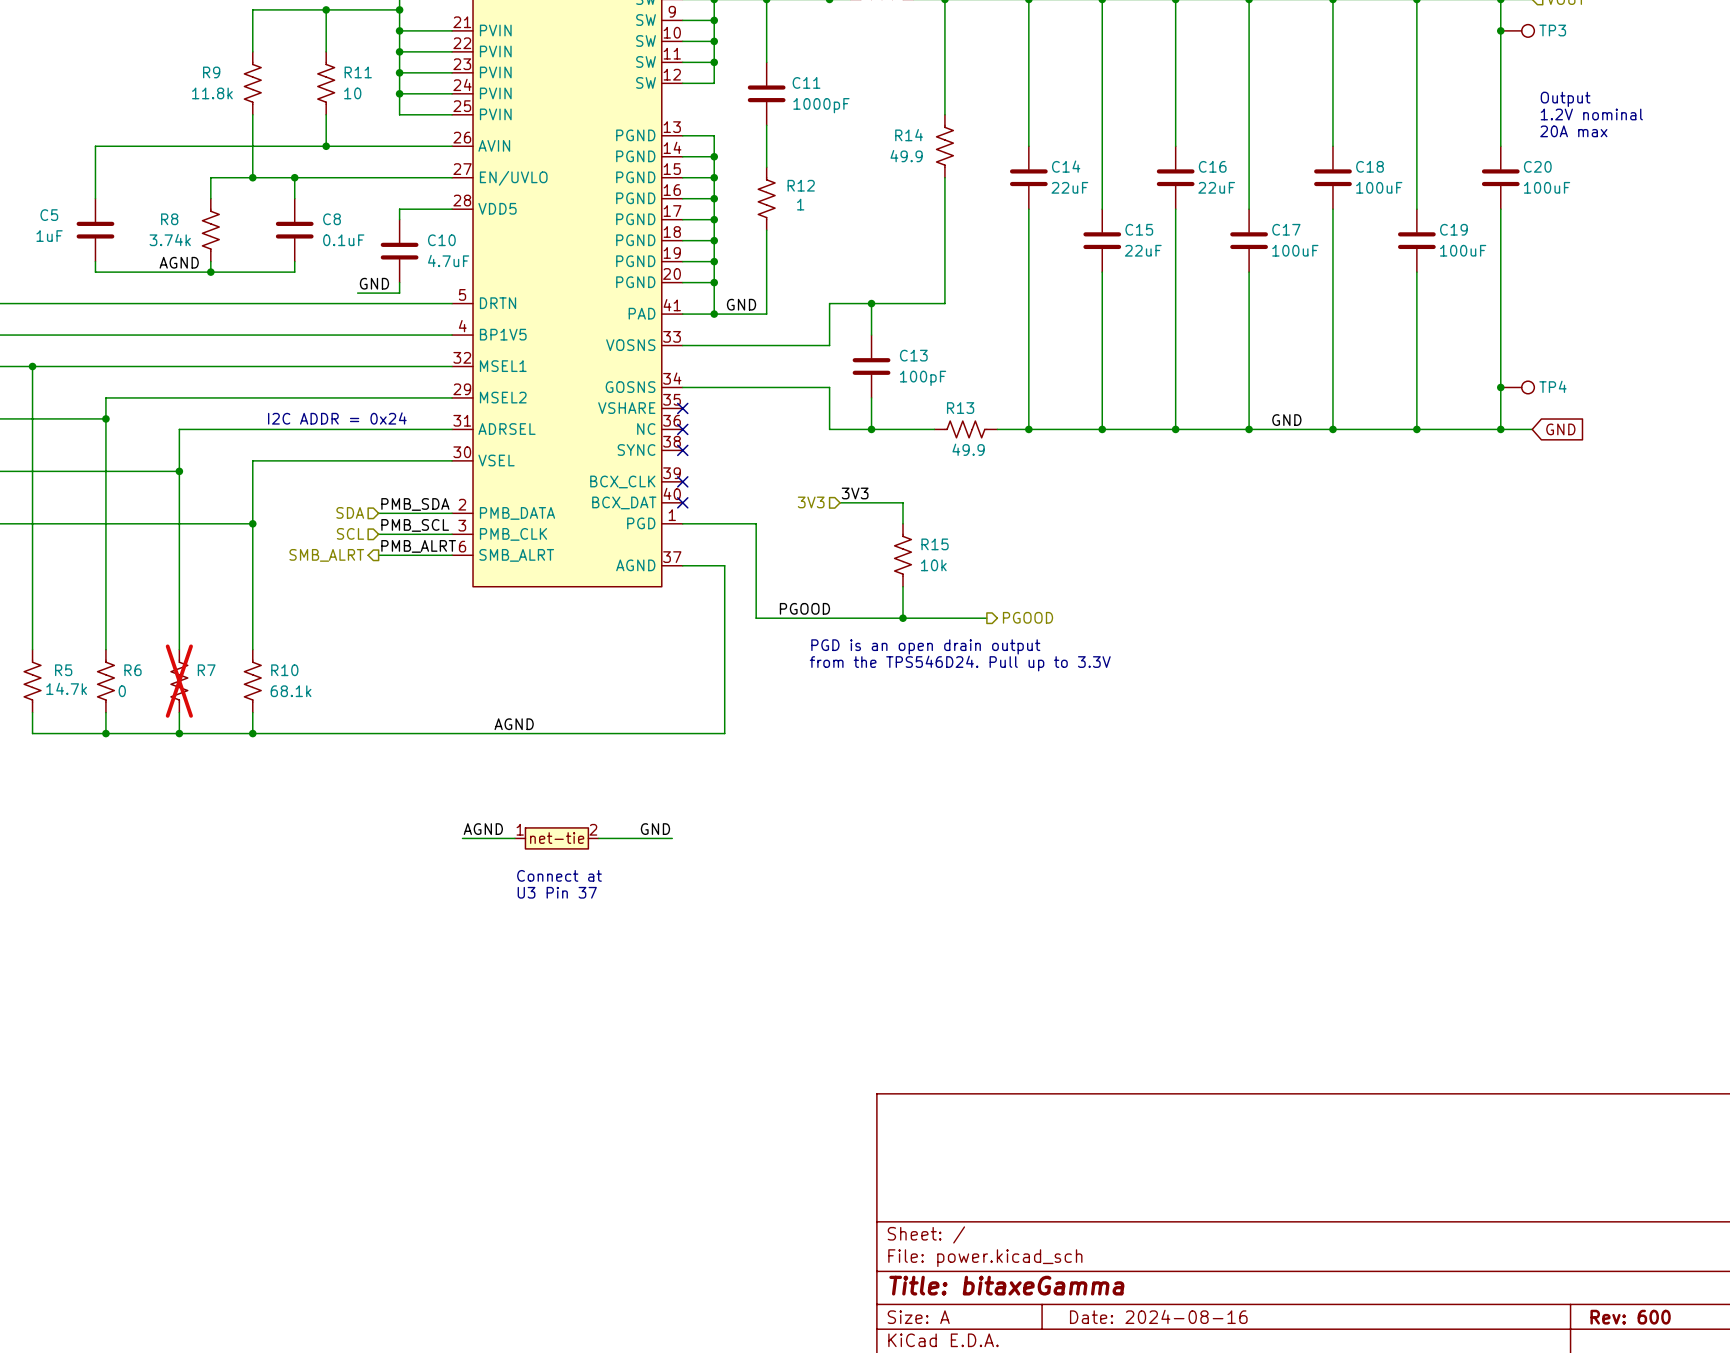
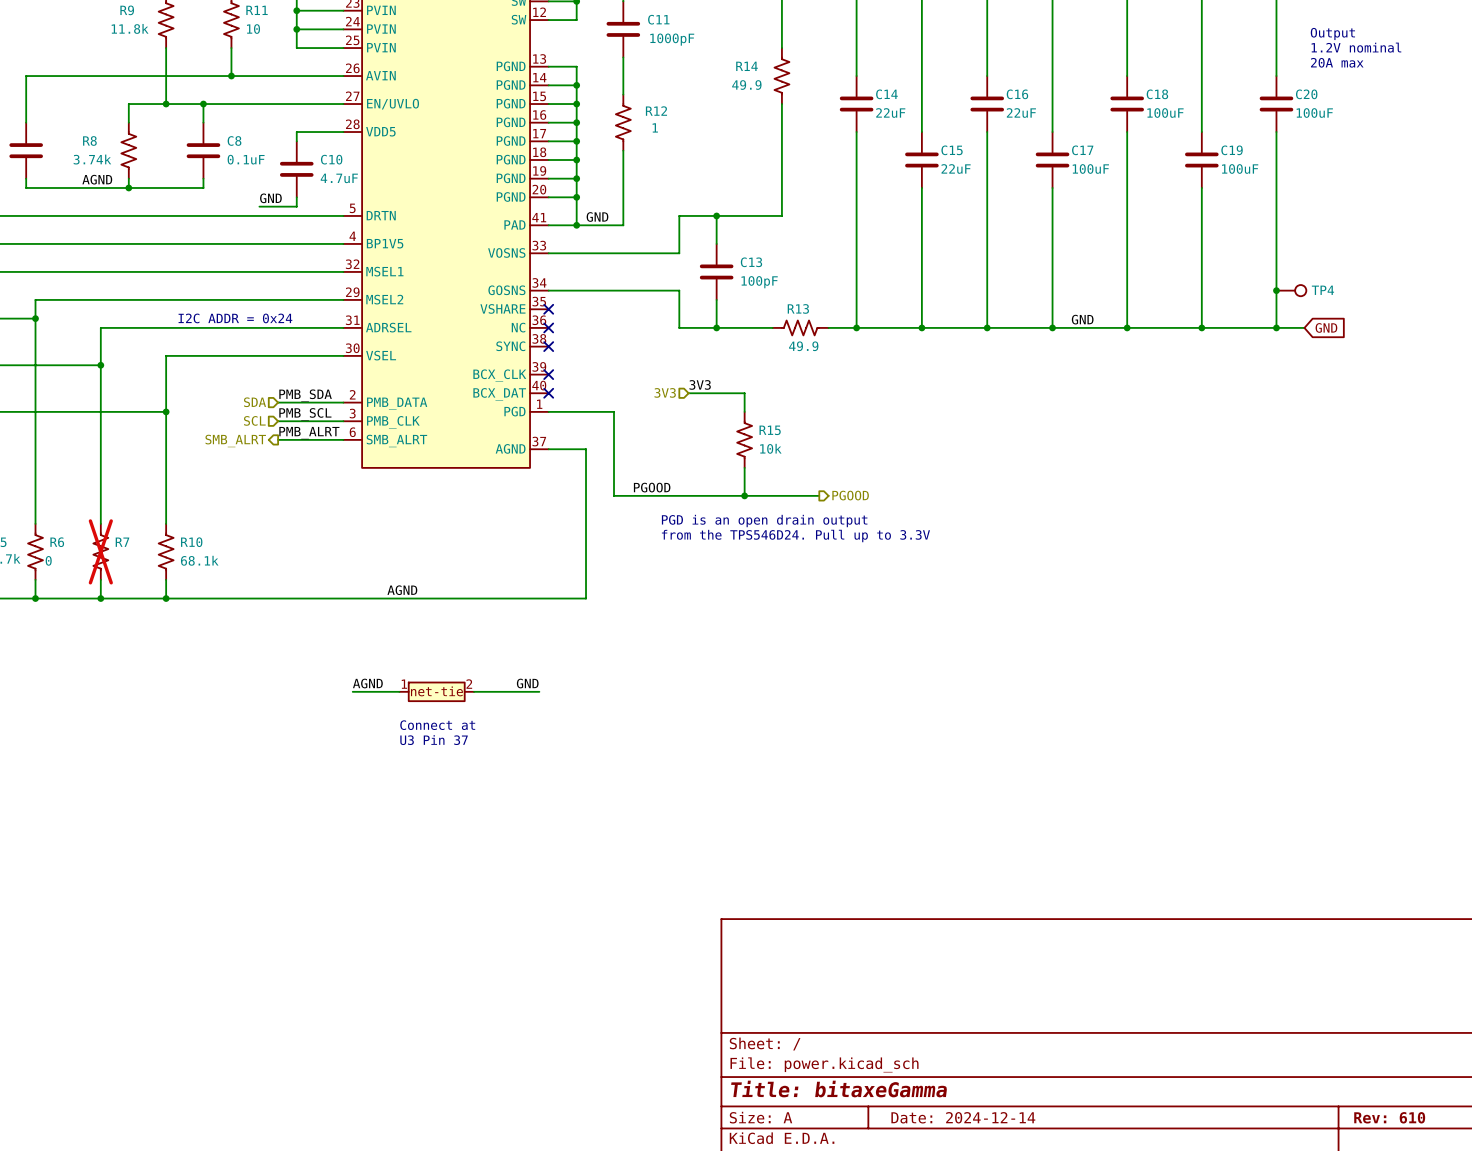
title block: Date: 2024-08-16 (1158, 1316) -> Date: 2024-12-14 (963, 1117)
title block: Rev: 600 (1630, 1317) -> Rev: 610 (1389, 1117)

